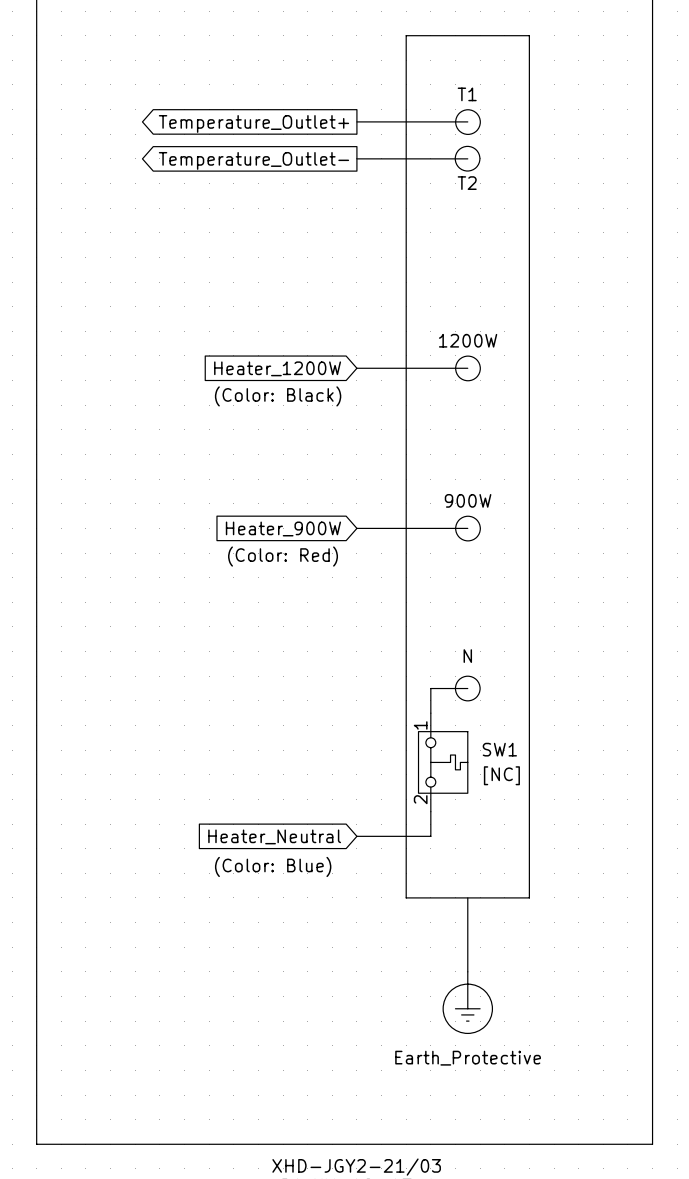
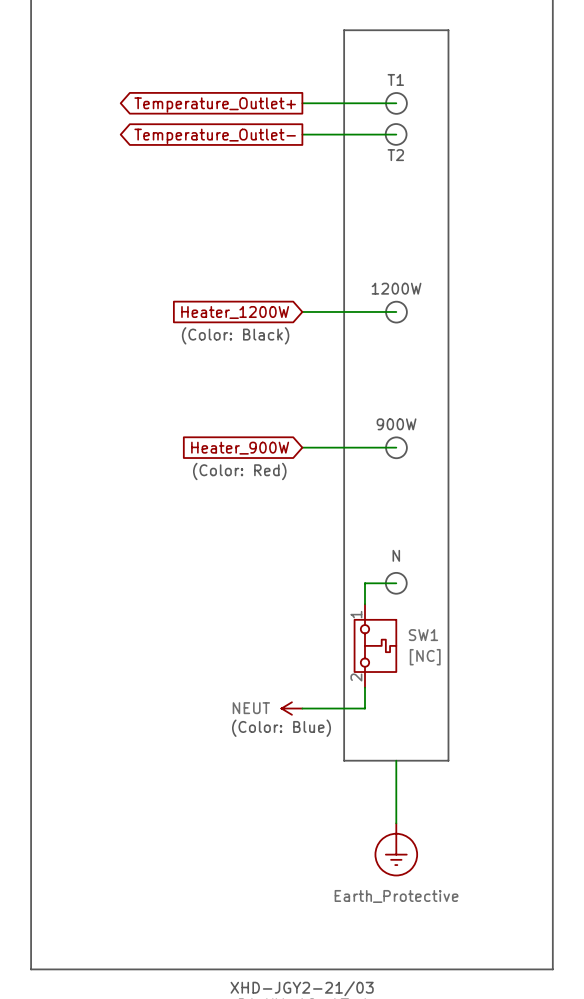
global label: Heater_Neutral (274, 836) -> none
power symbol: none -> NEUT (291, 708)
text position: (Color: Blue) (273, 866) -> (Color: Blue) (281, 728)

